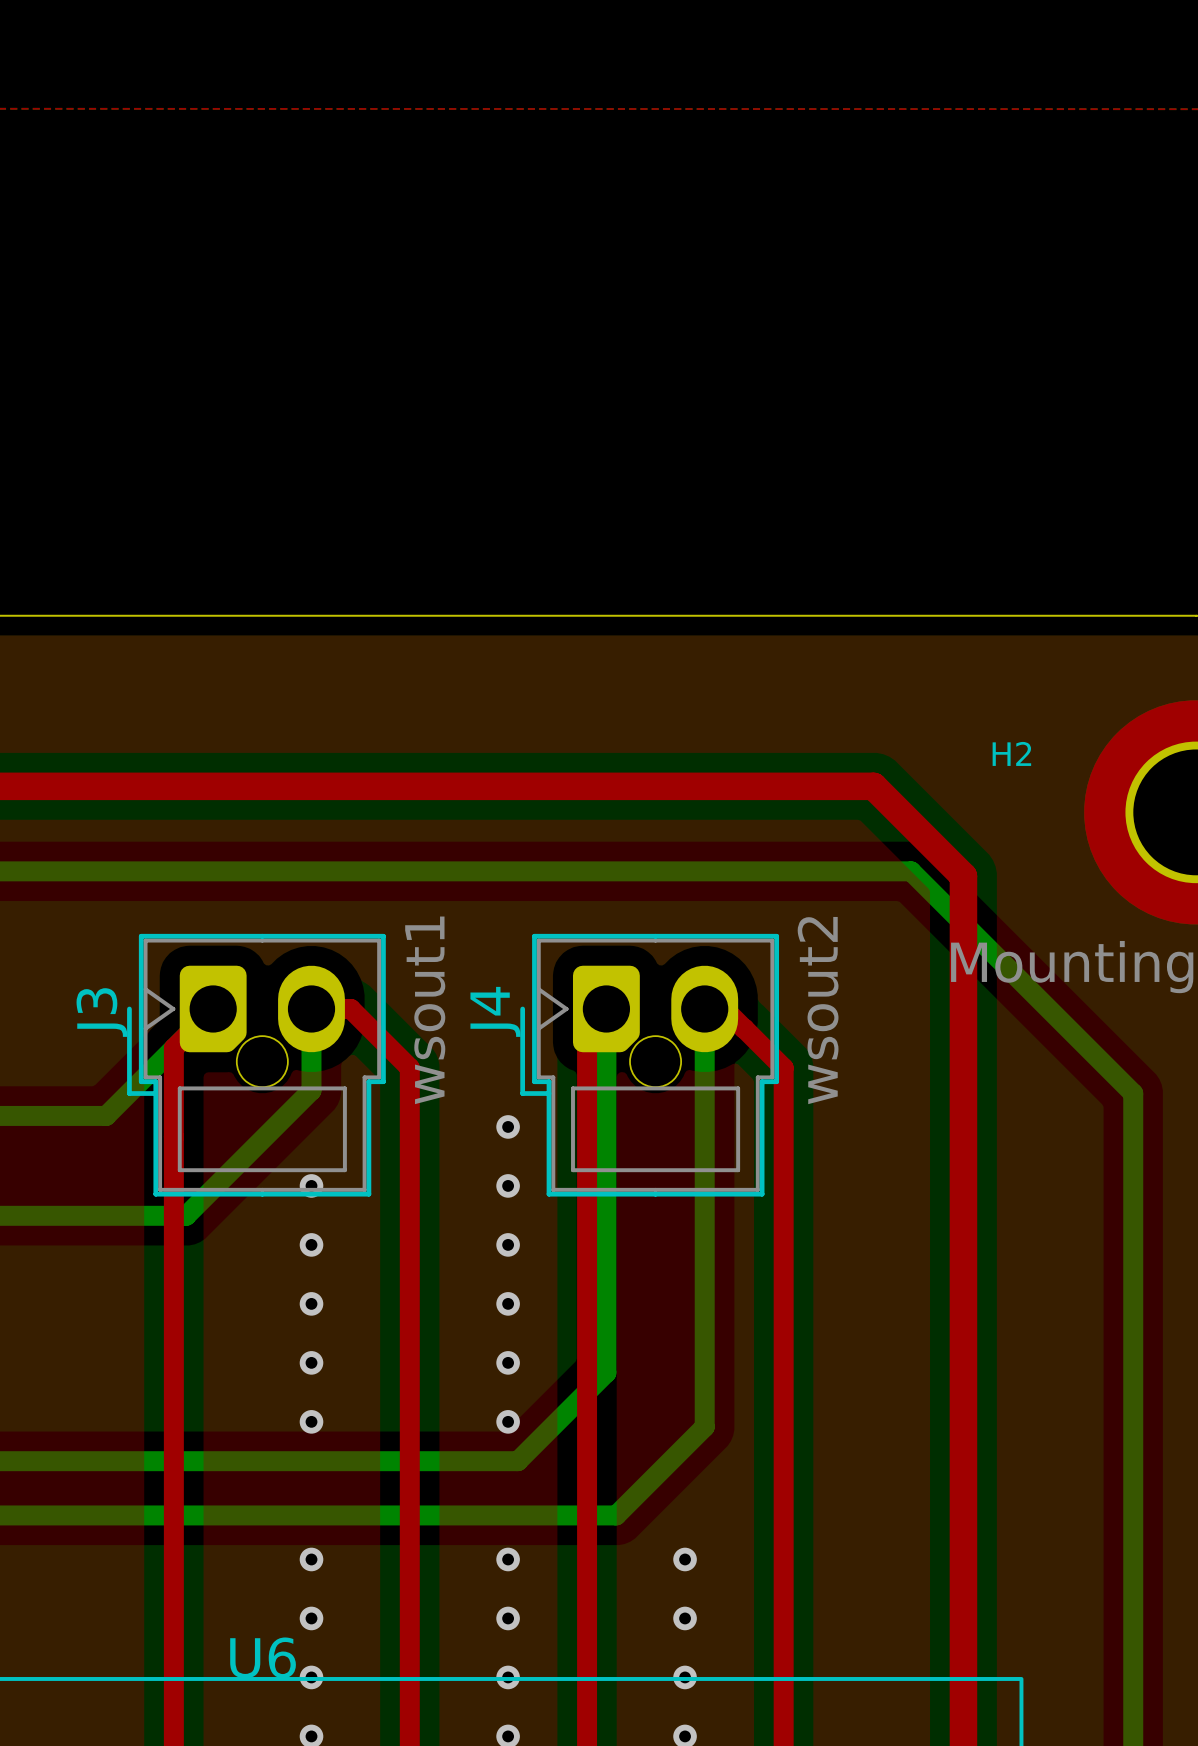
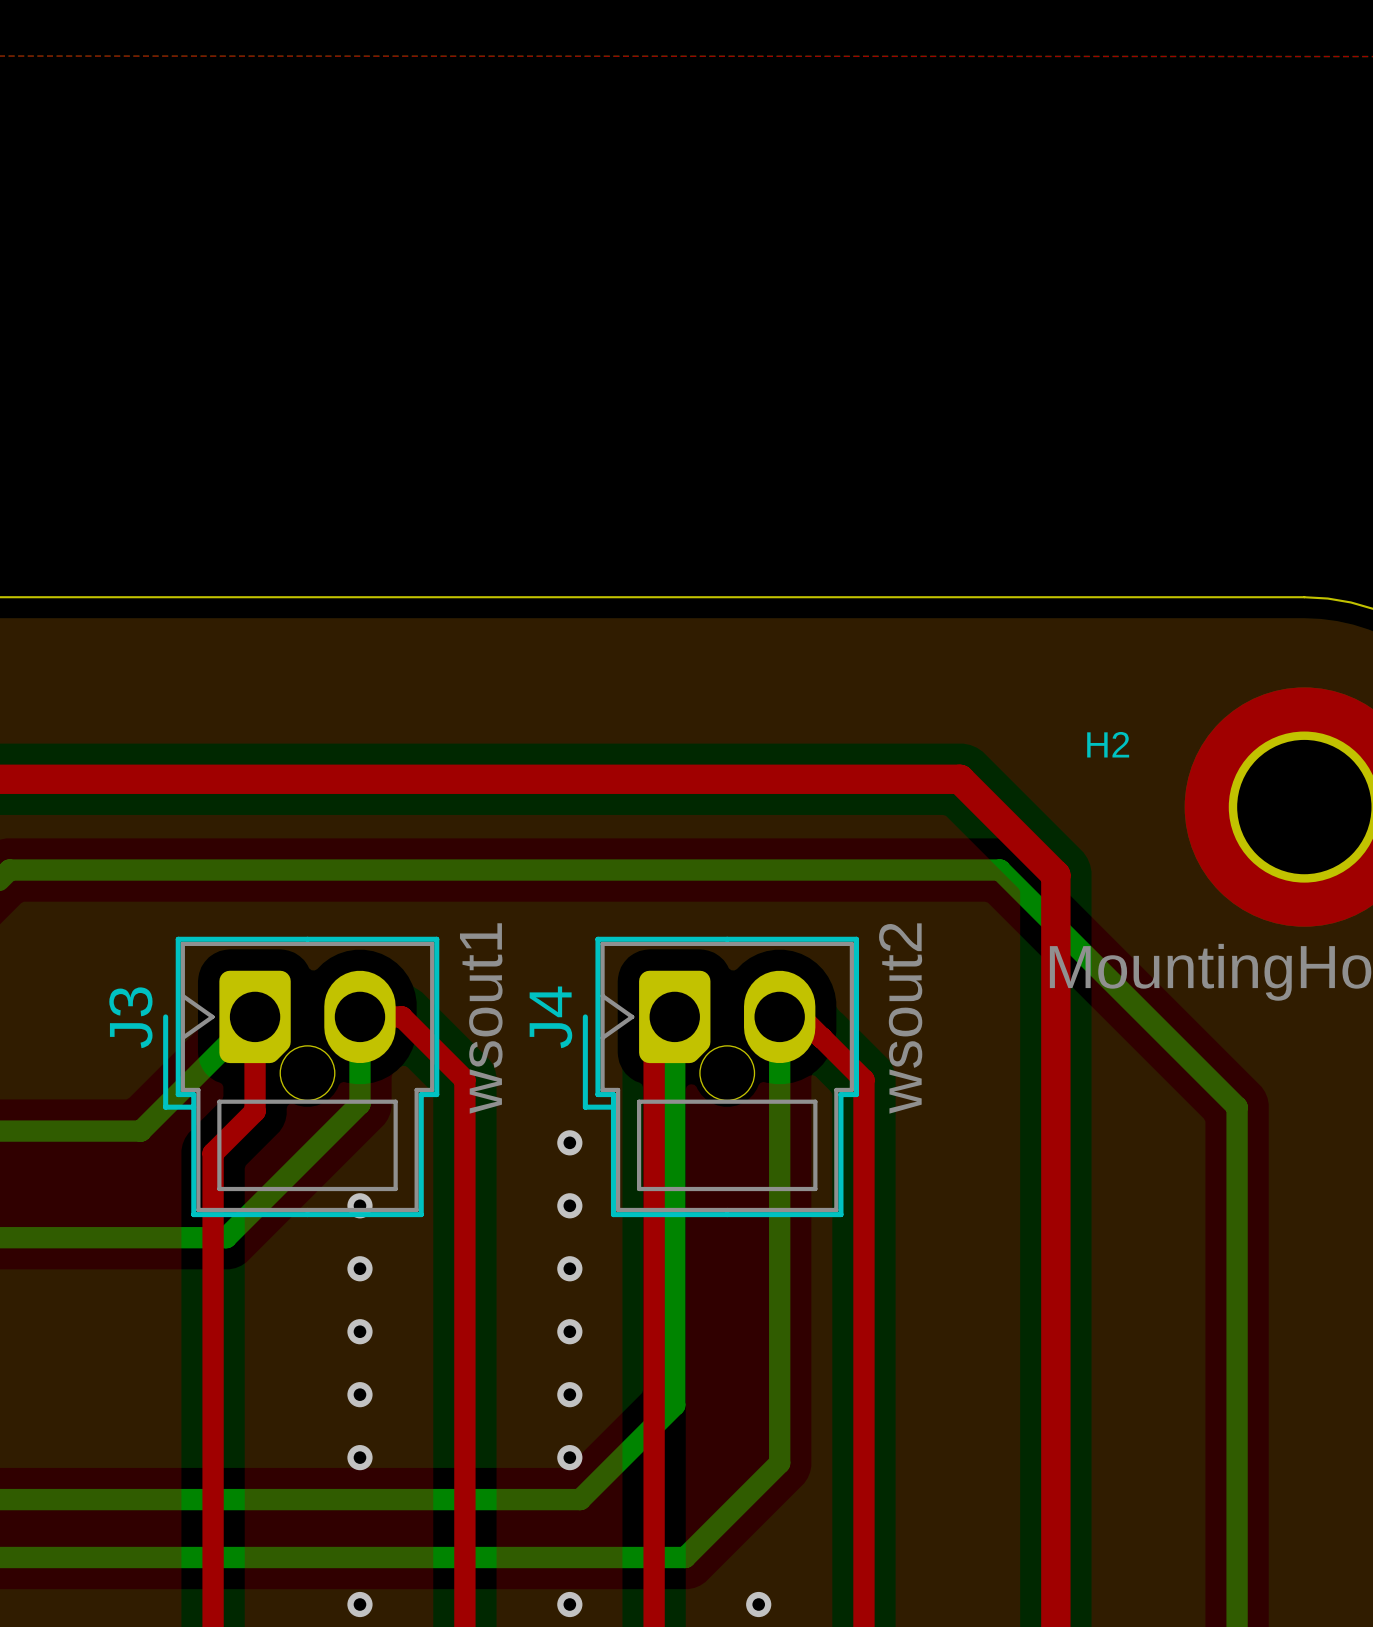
top track: (213, 1008) (173, 1048) (173, 1136) -> (255, 1016) (255, 1111) (213, 1153)

